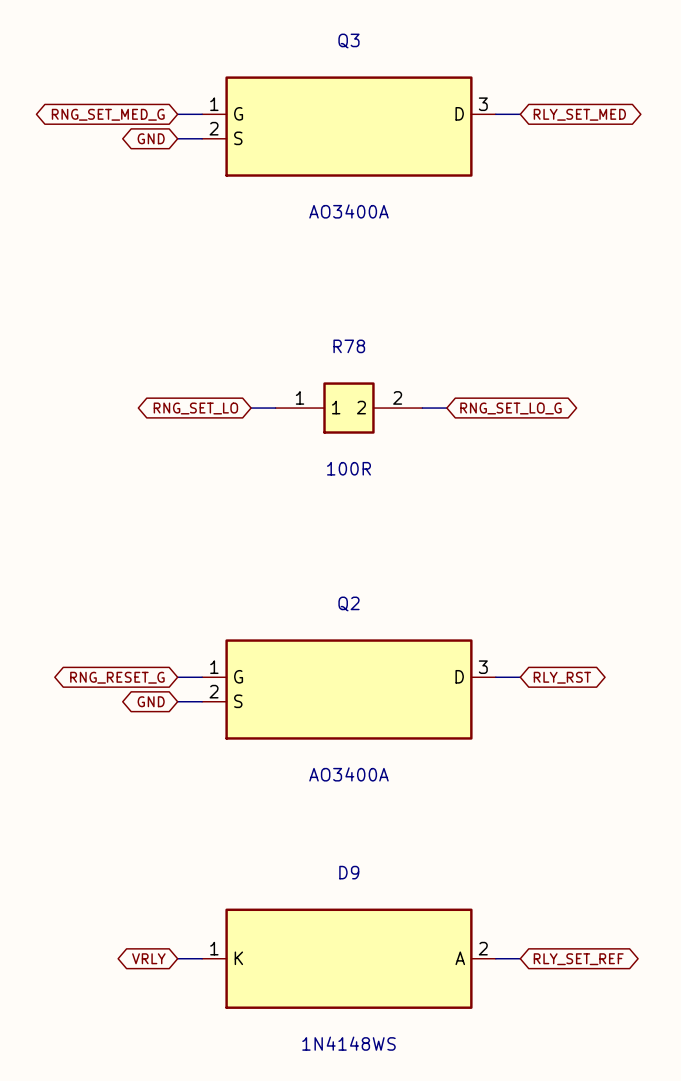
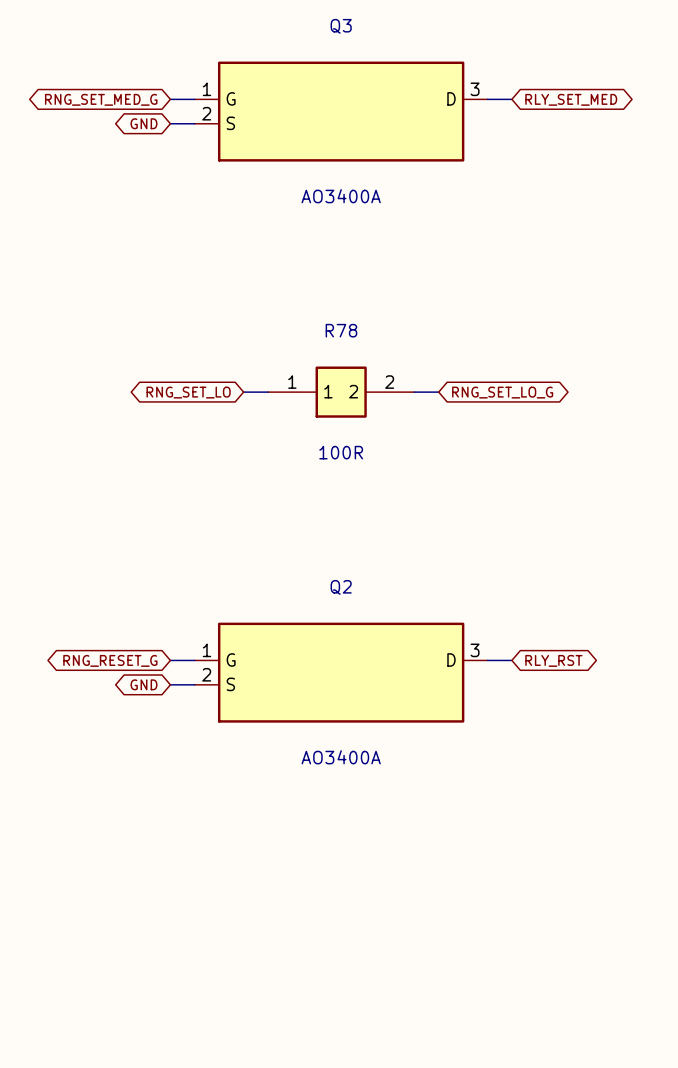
global label: VRLY (148, 958) -> none
wire: (177, 958) (202, 958) -> none
D9: 1N4148WS (348, 958) -> none
wire: (495, 958) (520, 958) -> none
global label: RLY_SET_REF (578, 959) -> none

